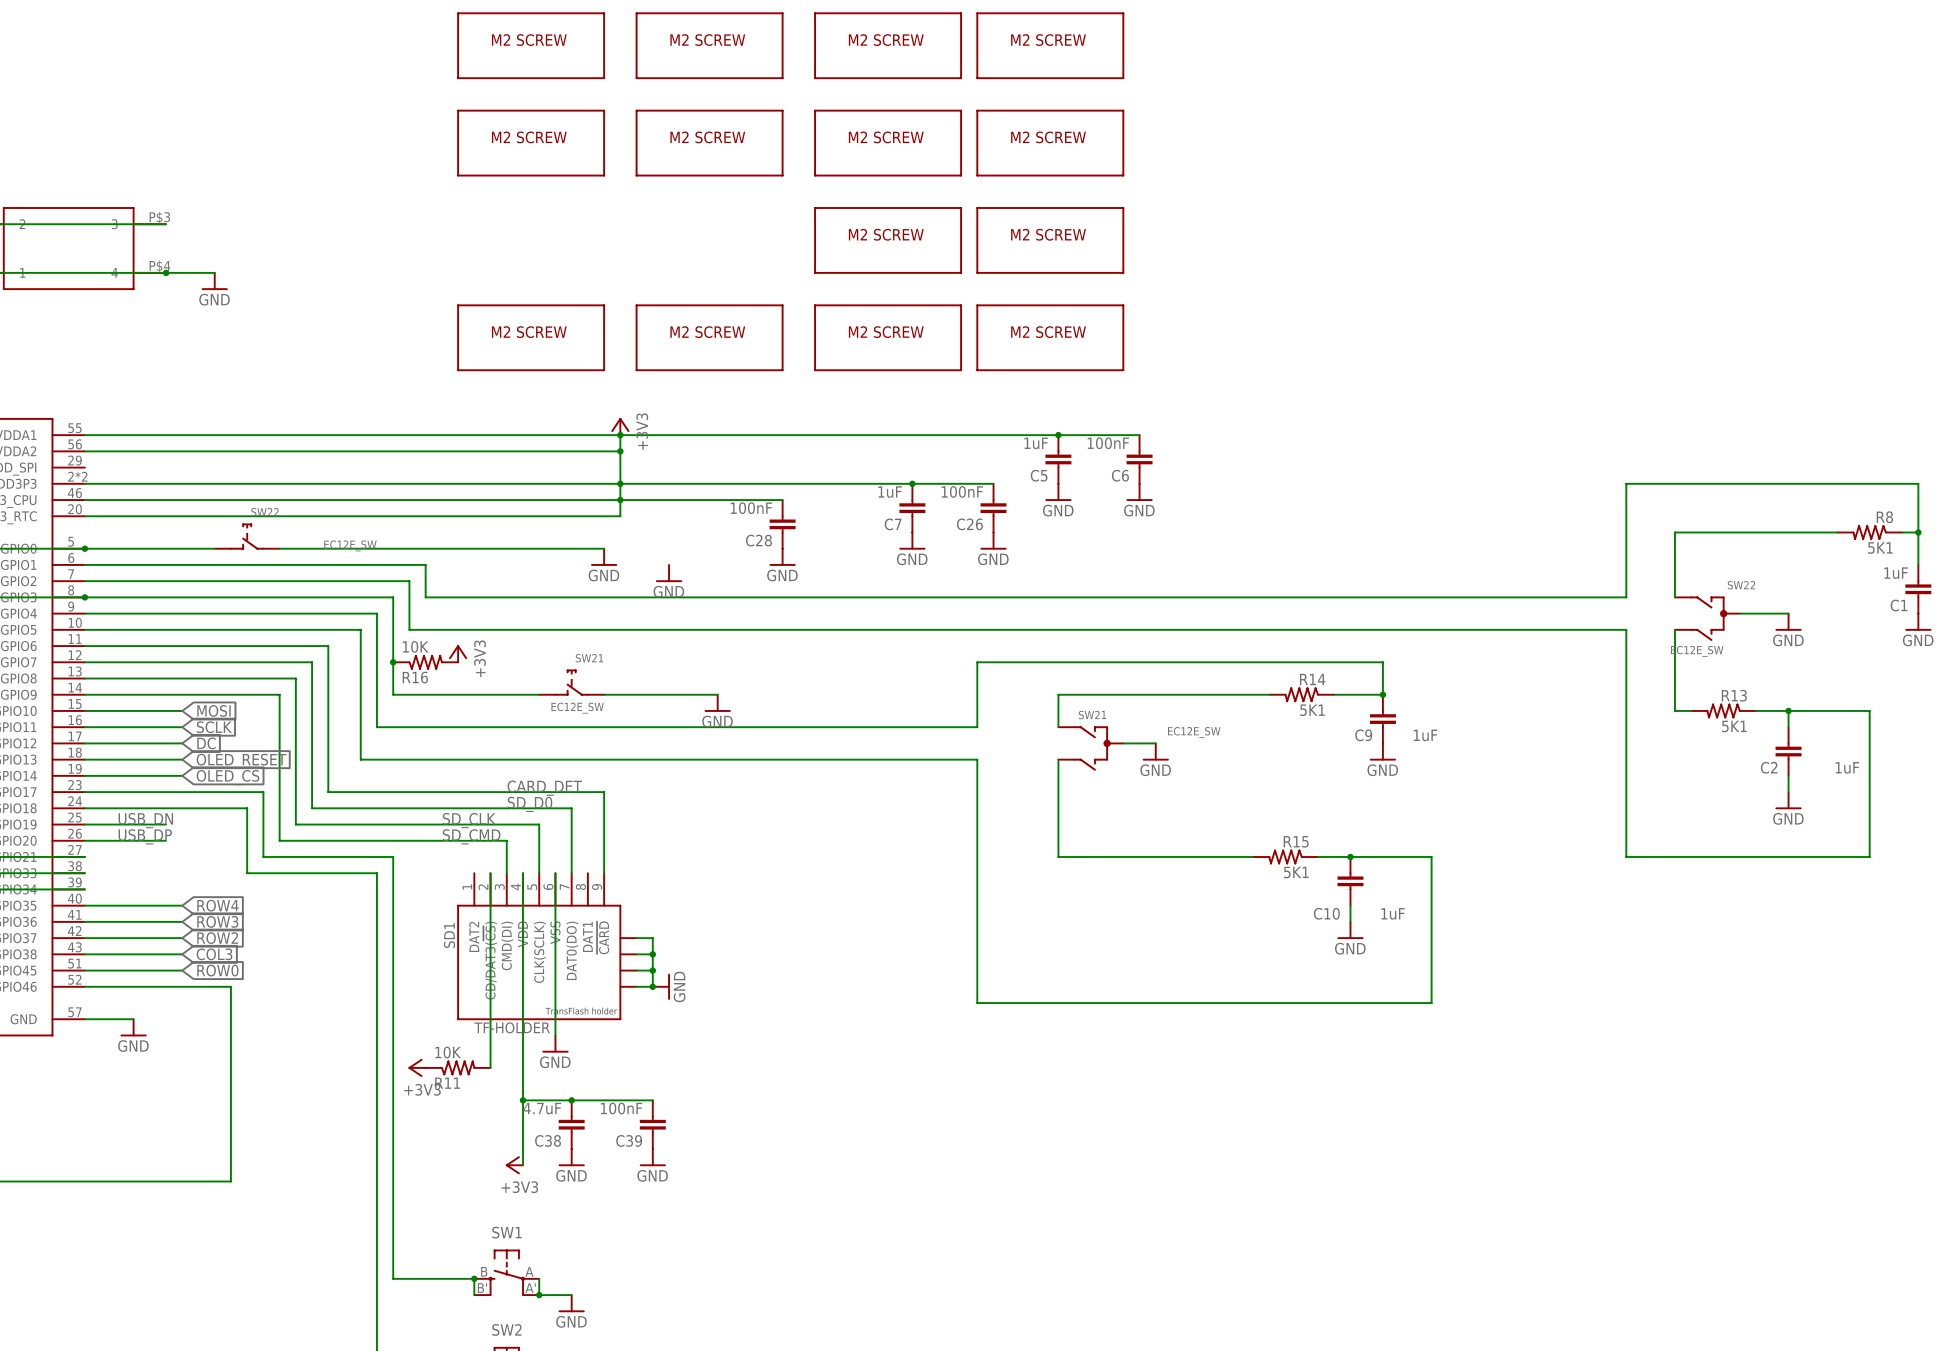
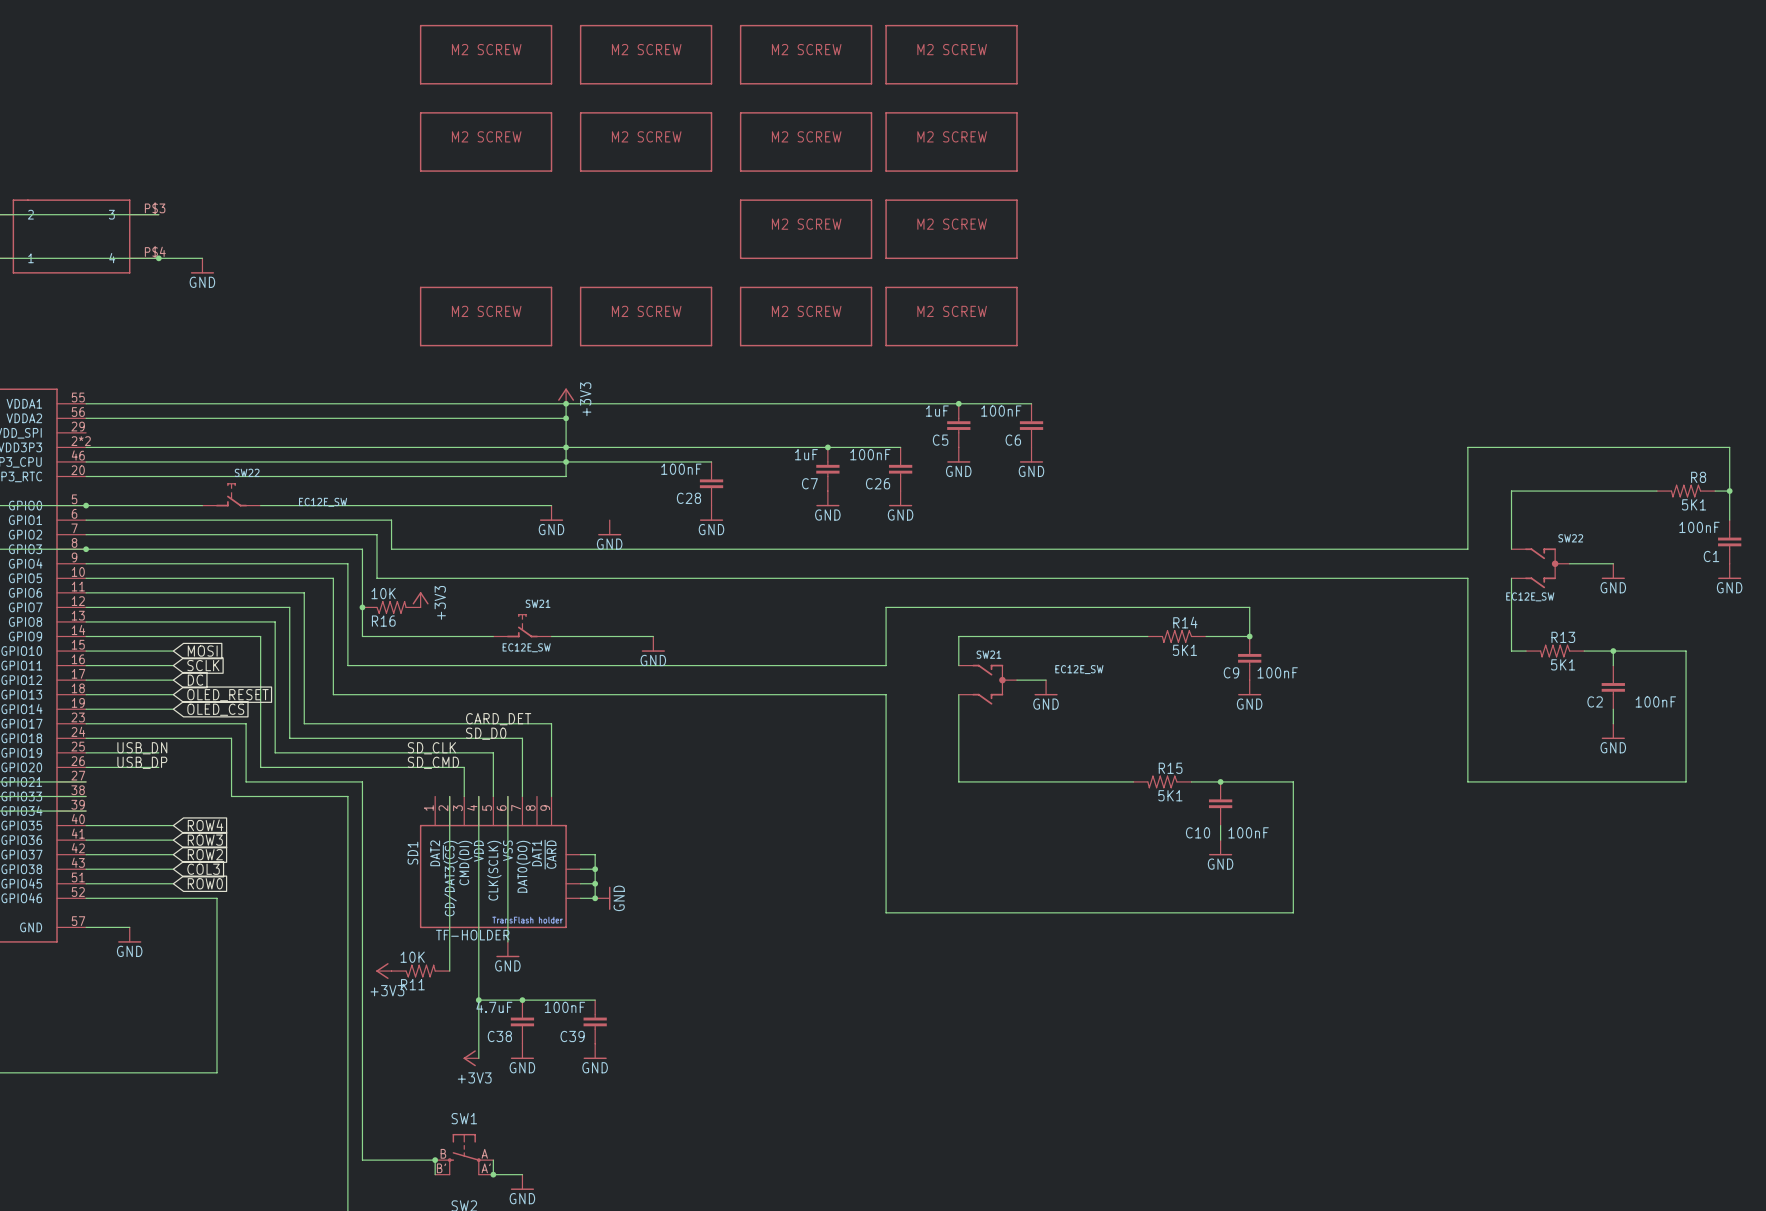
C1 value: 1uF (1896, 573) -> 100nF (1699, 527)
C9 value: 1uF (1425, 735) -> 100nF (1277, 672)
C2 value: 1uF (1847, 767) -> 100nF (1655, 701)
C10 value: 1uF (1393, 913) -> 100nF (1248, 832)

